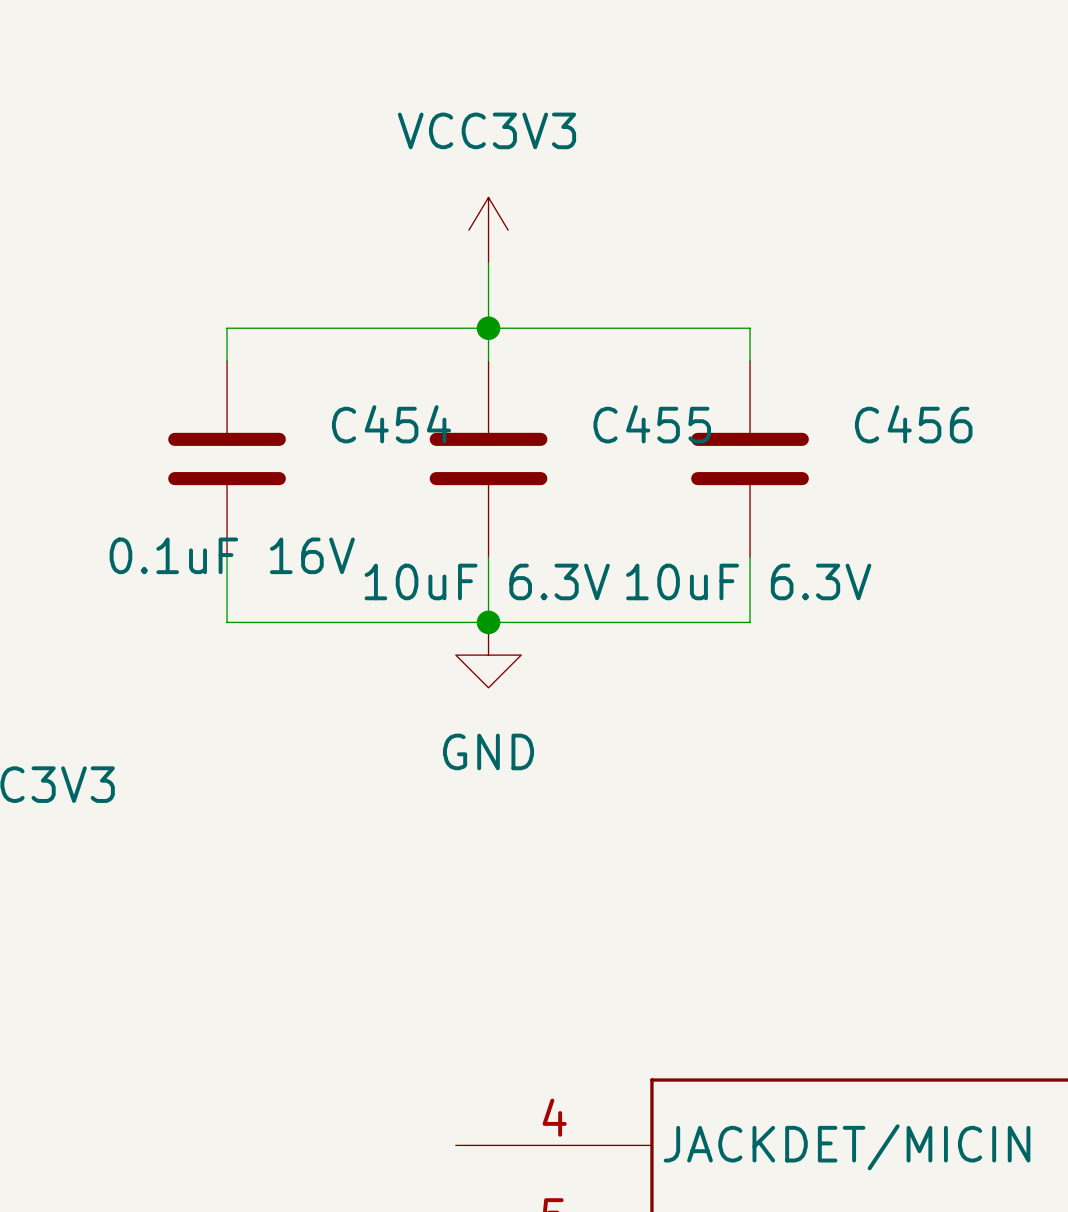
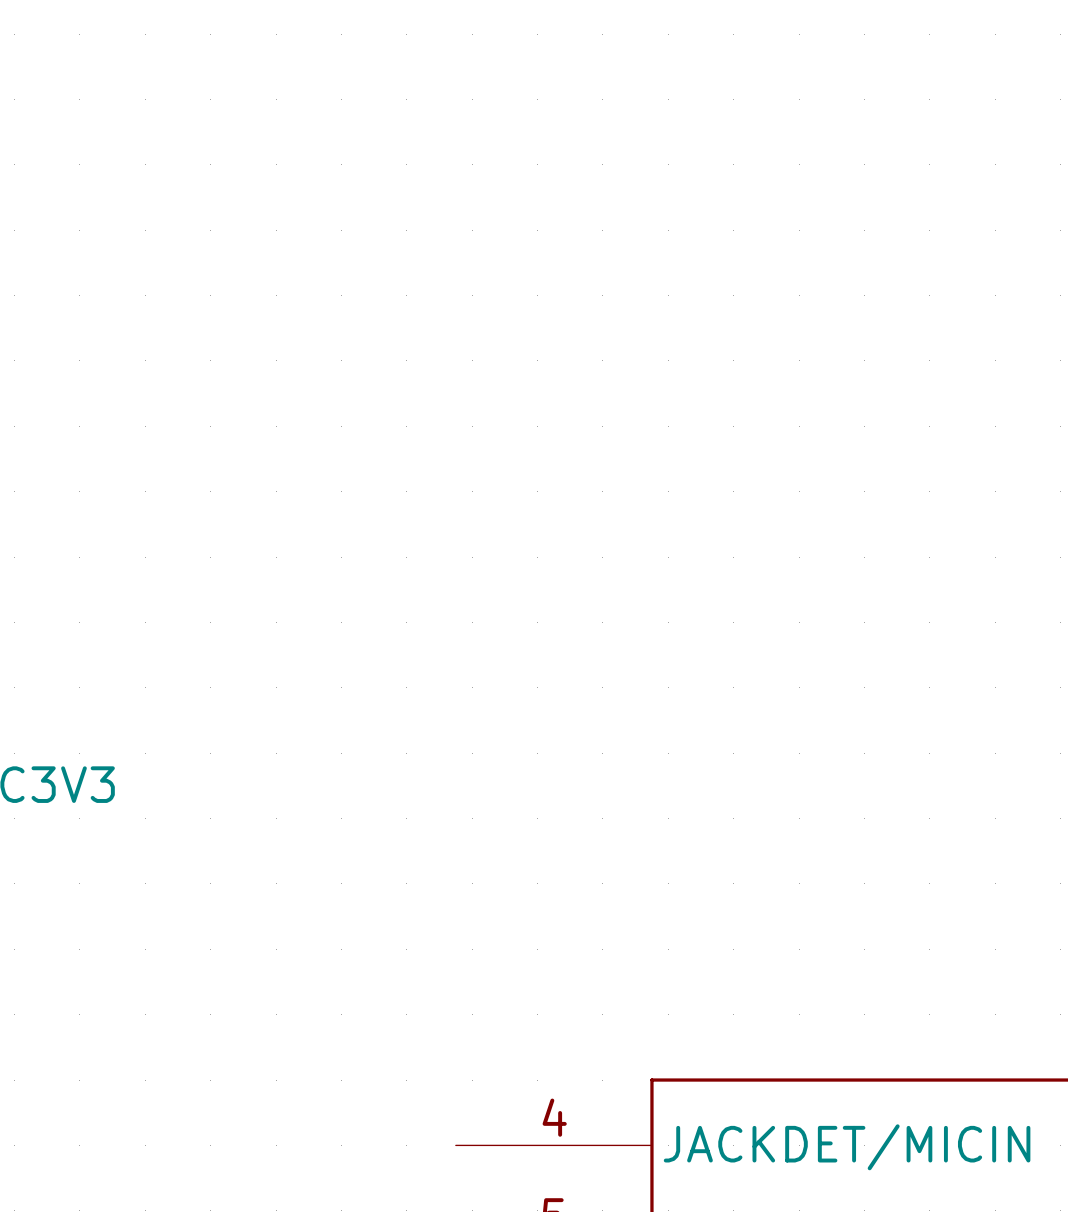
power symbol: VCC3V3 (488, 230) -> none
wire: (488, 262) (488, 360) -> none
junction: (488, 328) -> none
wire: (227, 360) (227, 328) (750, 328) (750, 360) -> none
C454: 0.1uF 16V (227, 458) -> none
C455: 10uF 6.3V (488, 458) -> none
C456: 10uF 6.3V (750, 458) -> none
wire: (227, 557) (227, 622) (750, 622) (750, 557) -> none
wire: (488, 557) (488, 622) -> none
junction: (488, 622) -> none
power symbol: GND (488, 655) -> none

